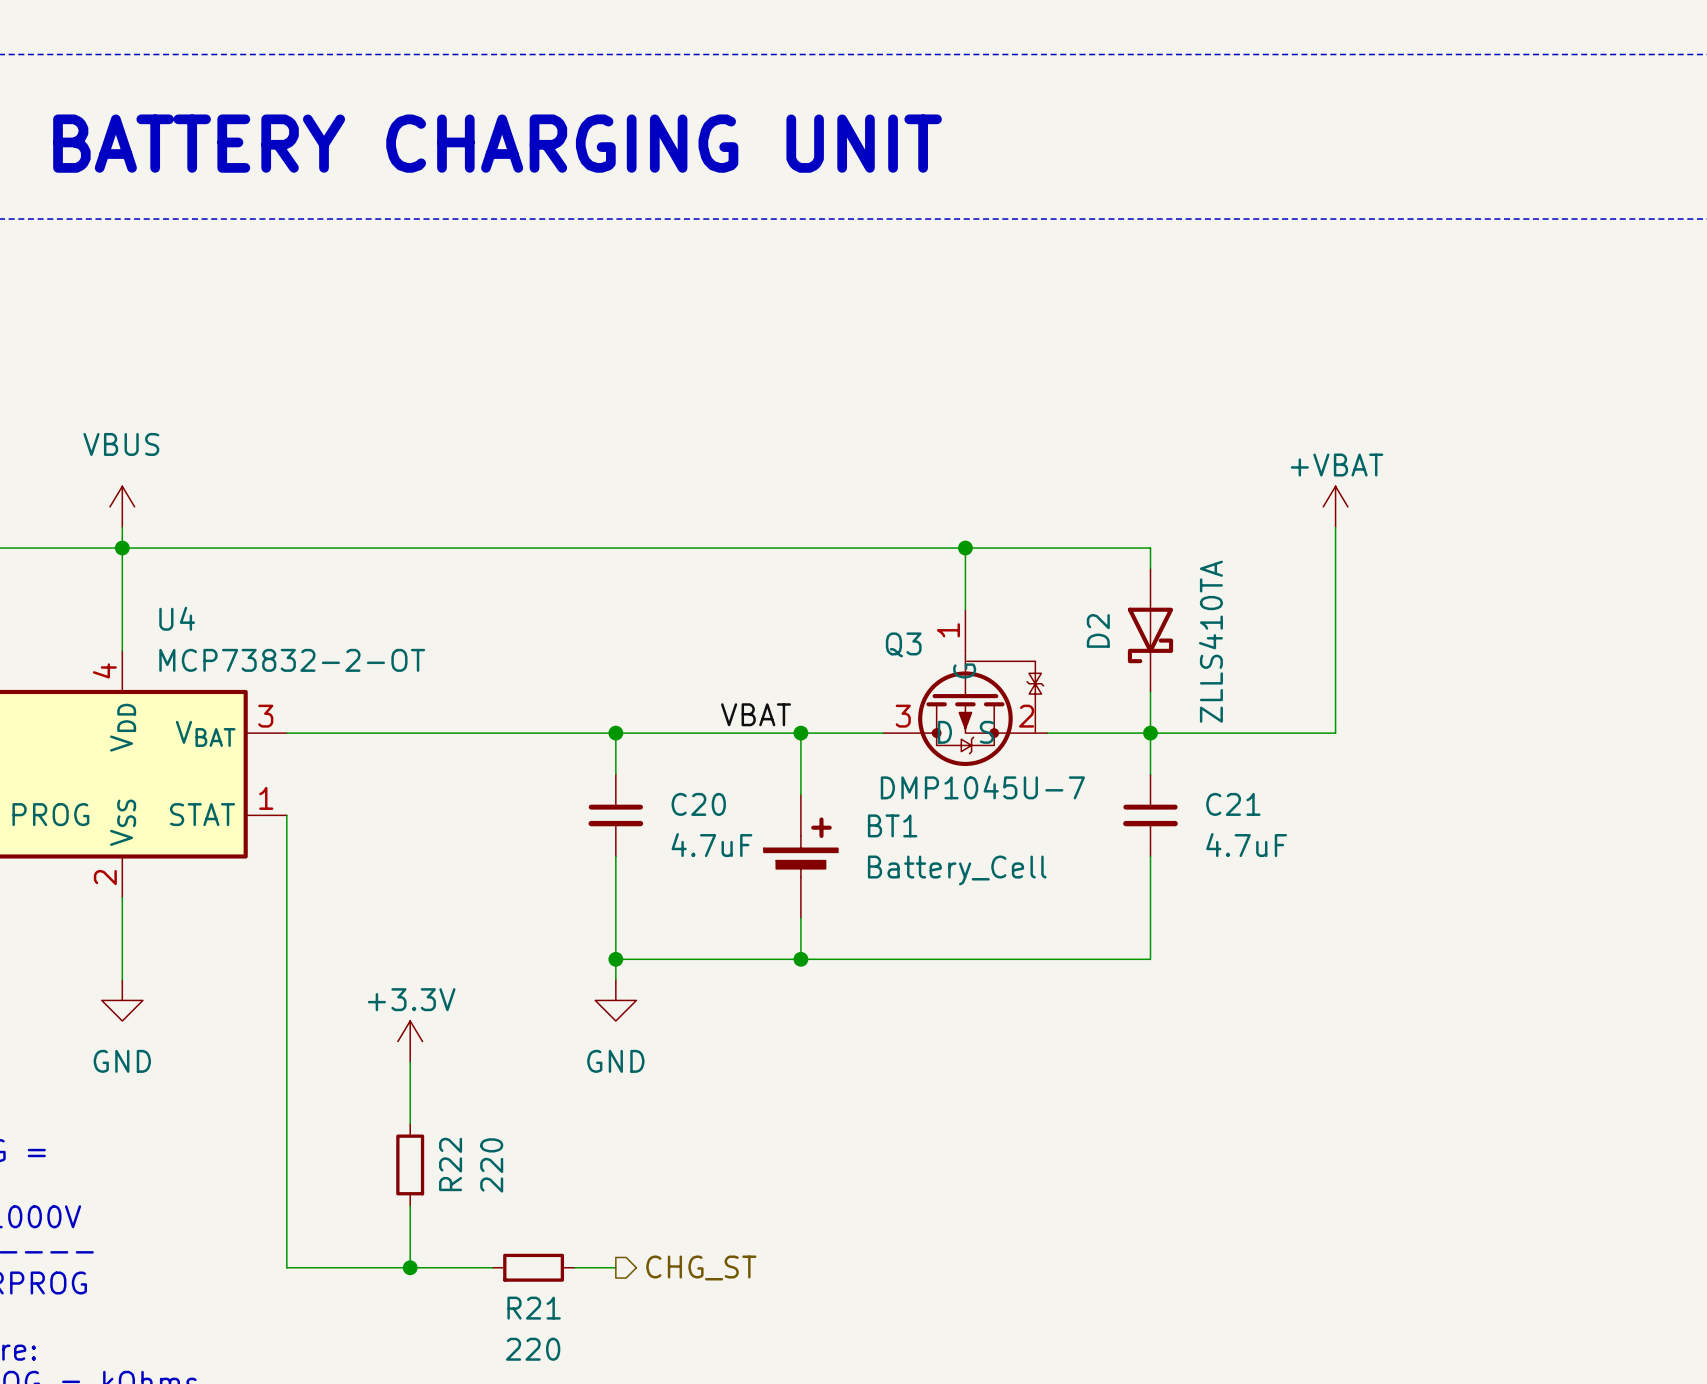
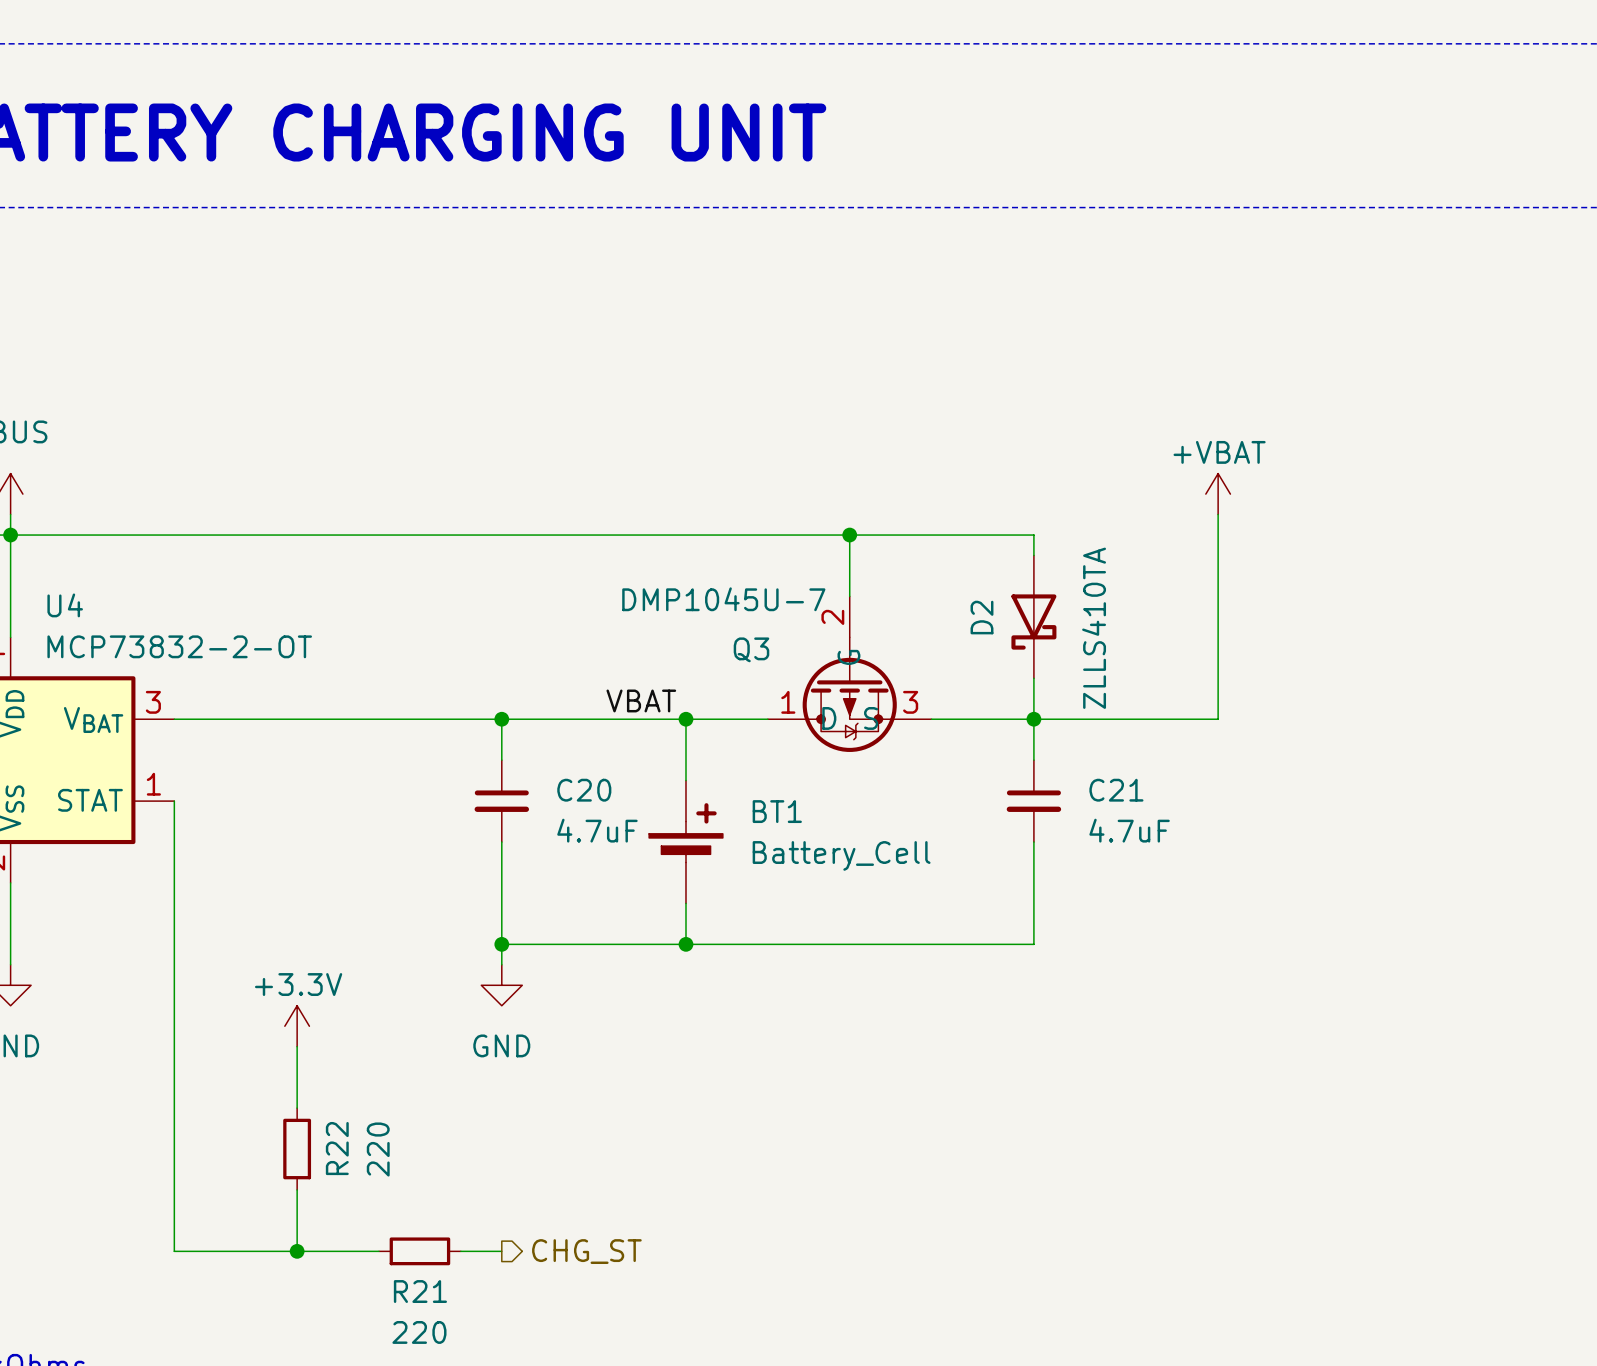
Q3 symbol: [883, 609, 1048, 767] -> [767, 596, 932, 752]
Q3 name position: Q3 (903, 644) -> Q3 (751, 649)
Q3 value position: DMP1045U-7 (982, 787) -> DMP1045U-7 (723, 599)

